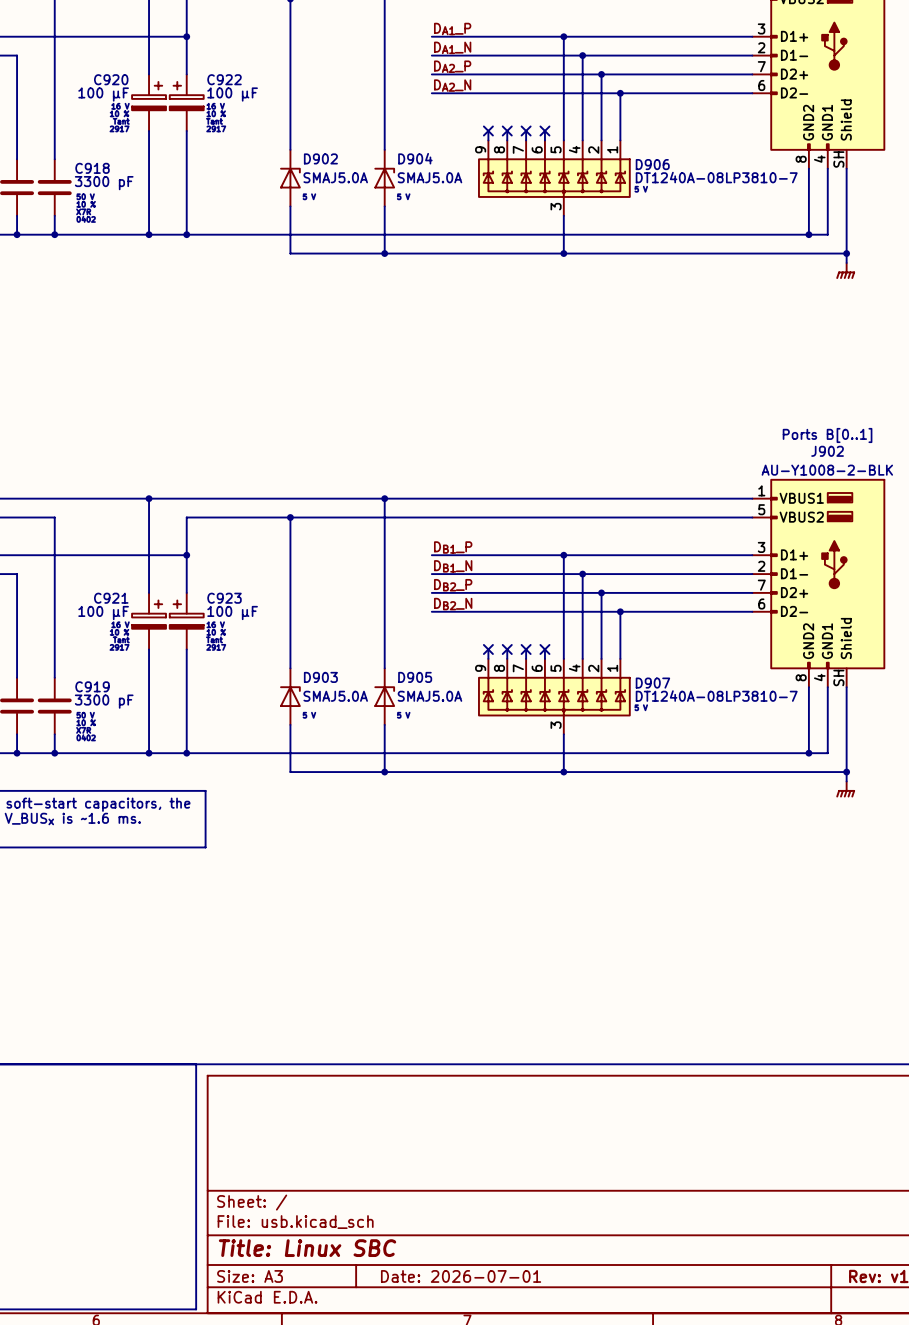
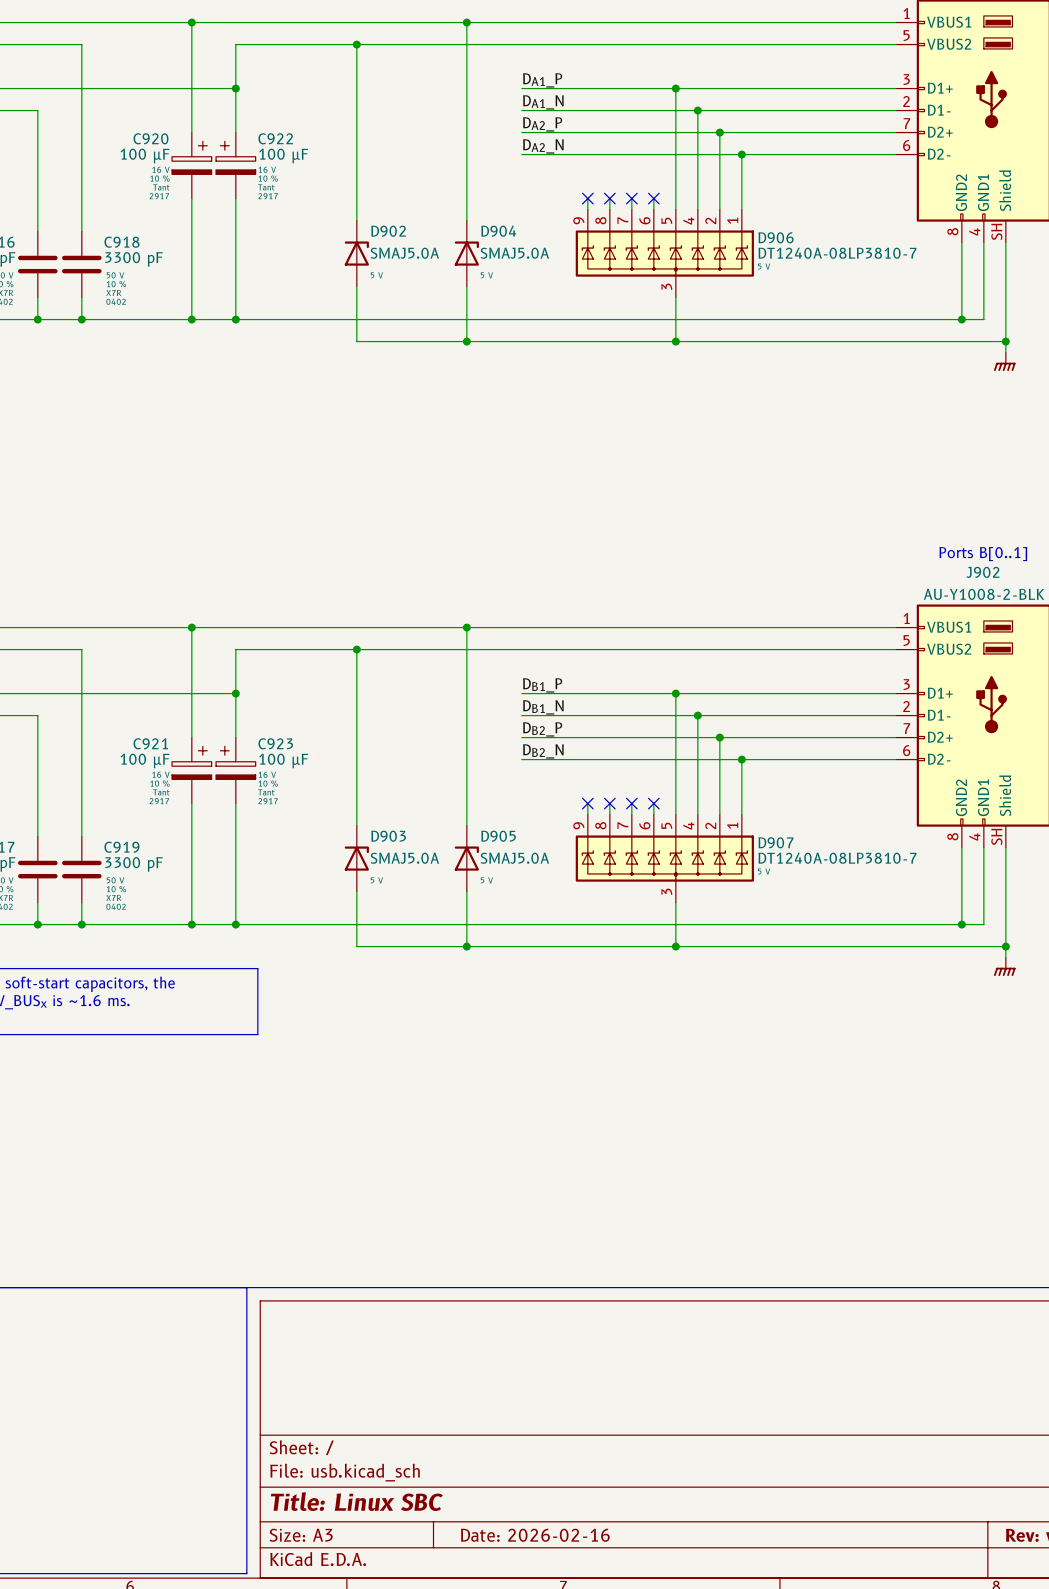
title block: Date: 2026-07-01 (461, 1276) -> Date: 2026-02-16 (535, 1535)

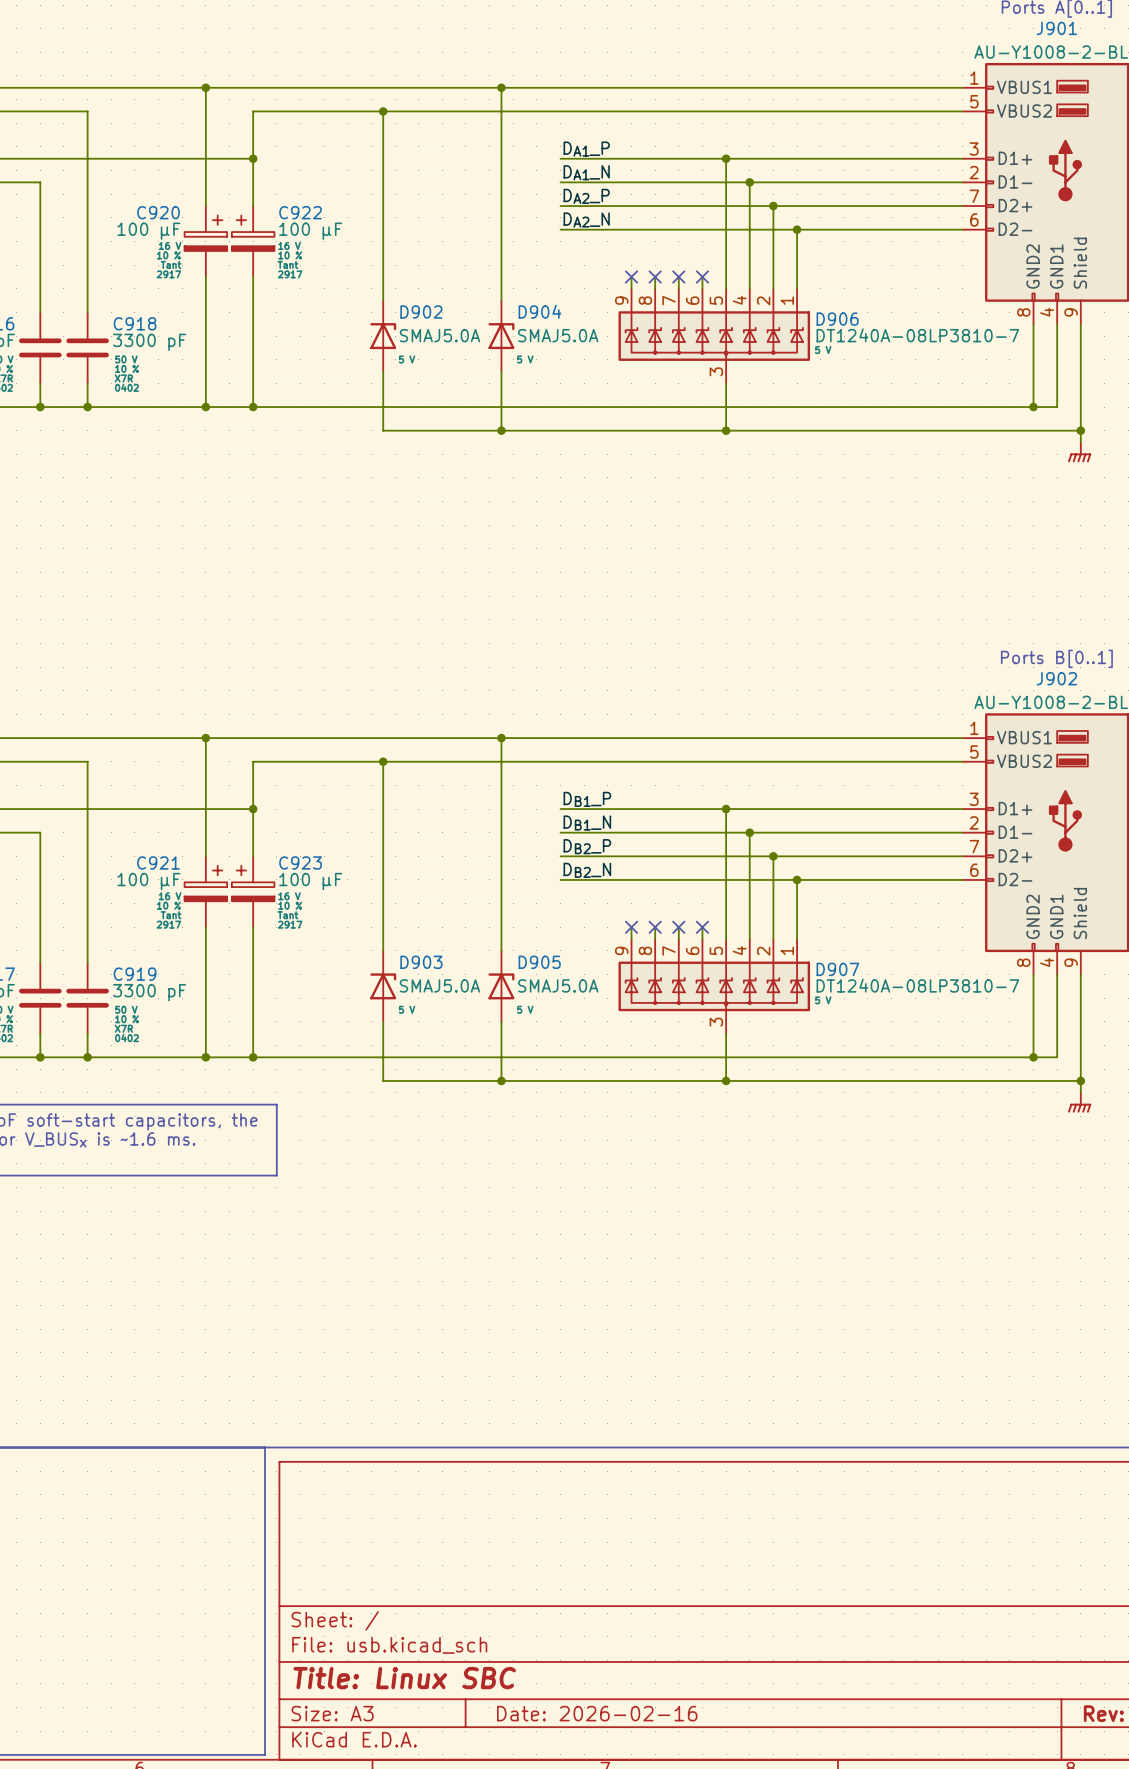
J901 pin number: SH (996, 231) -> 9 (1071, 312)
J902 pin number: SH (996, 836) -> 9 (1071, 962)

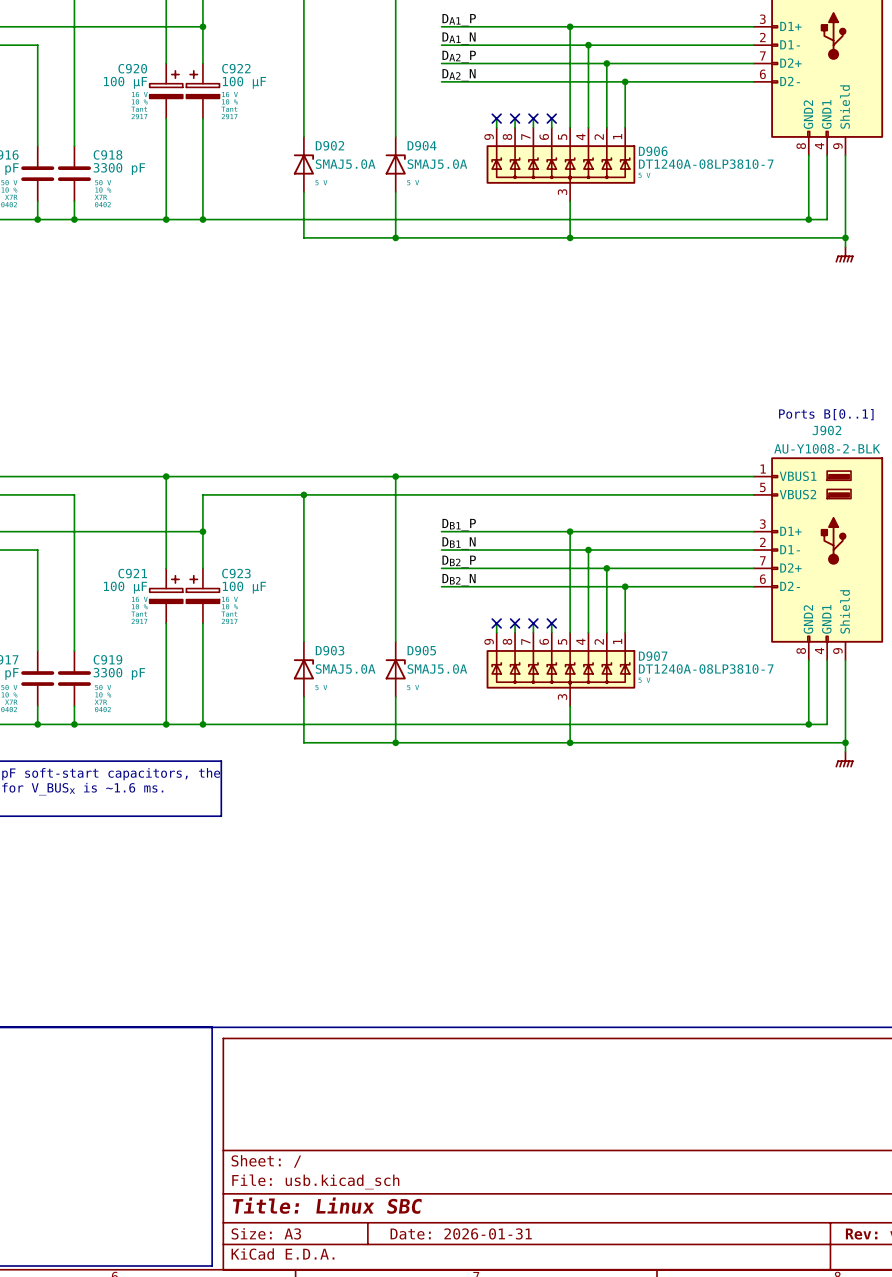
title block: Date: 2026-02-16 (597, 1713) -> Date: 2026-01-31 (461, 1233)

